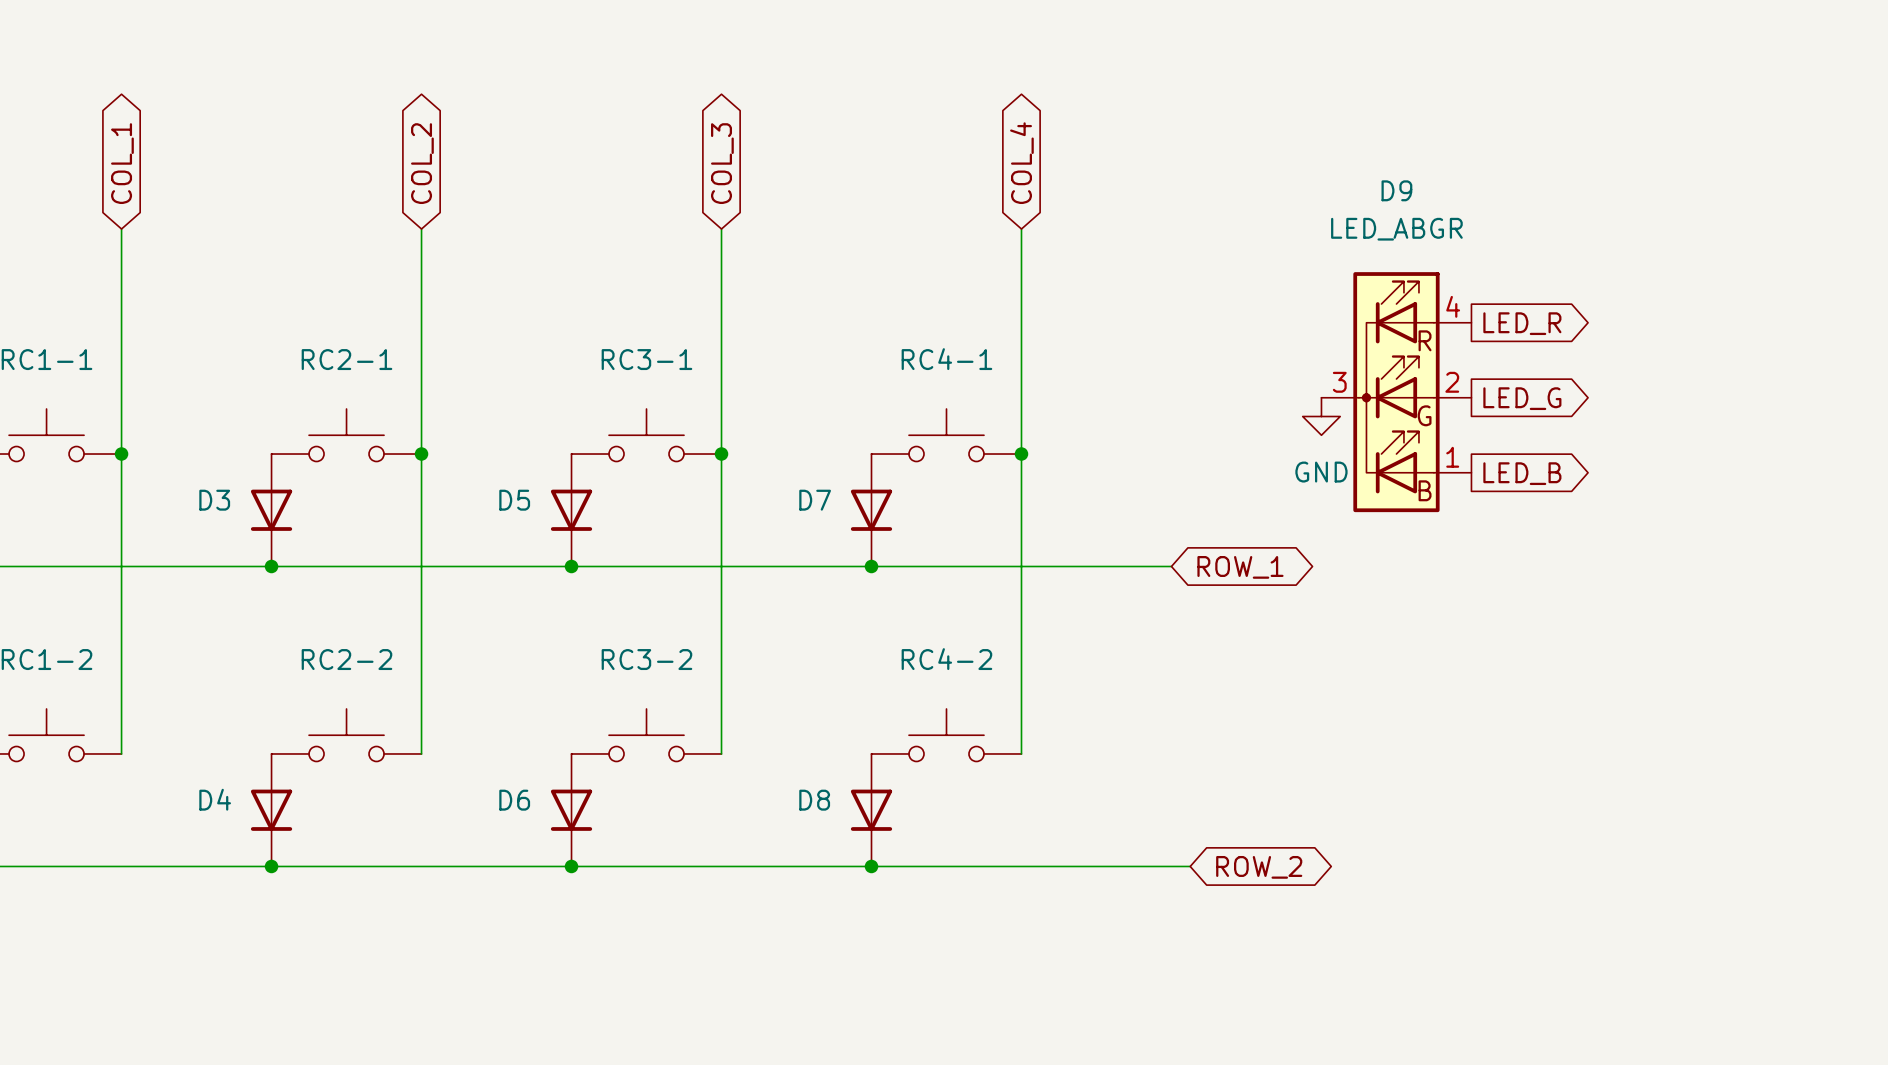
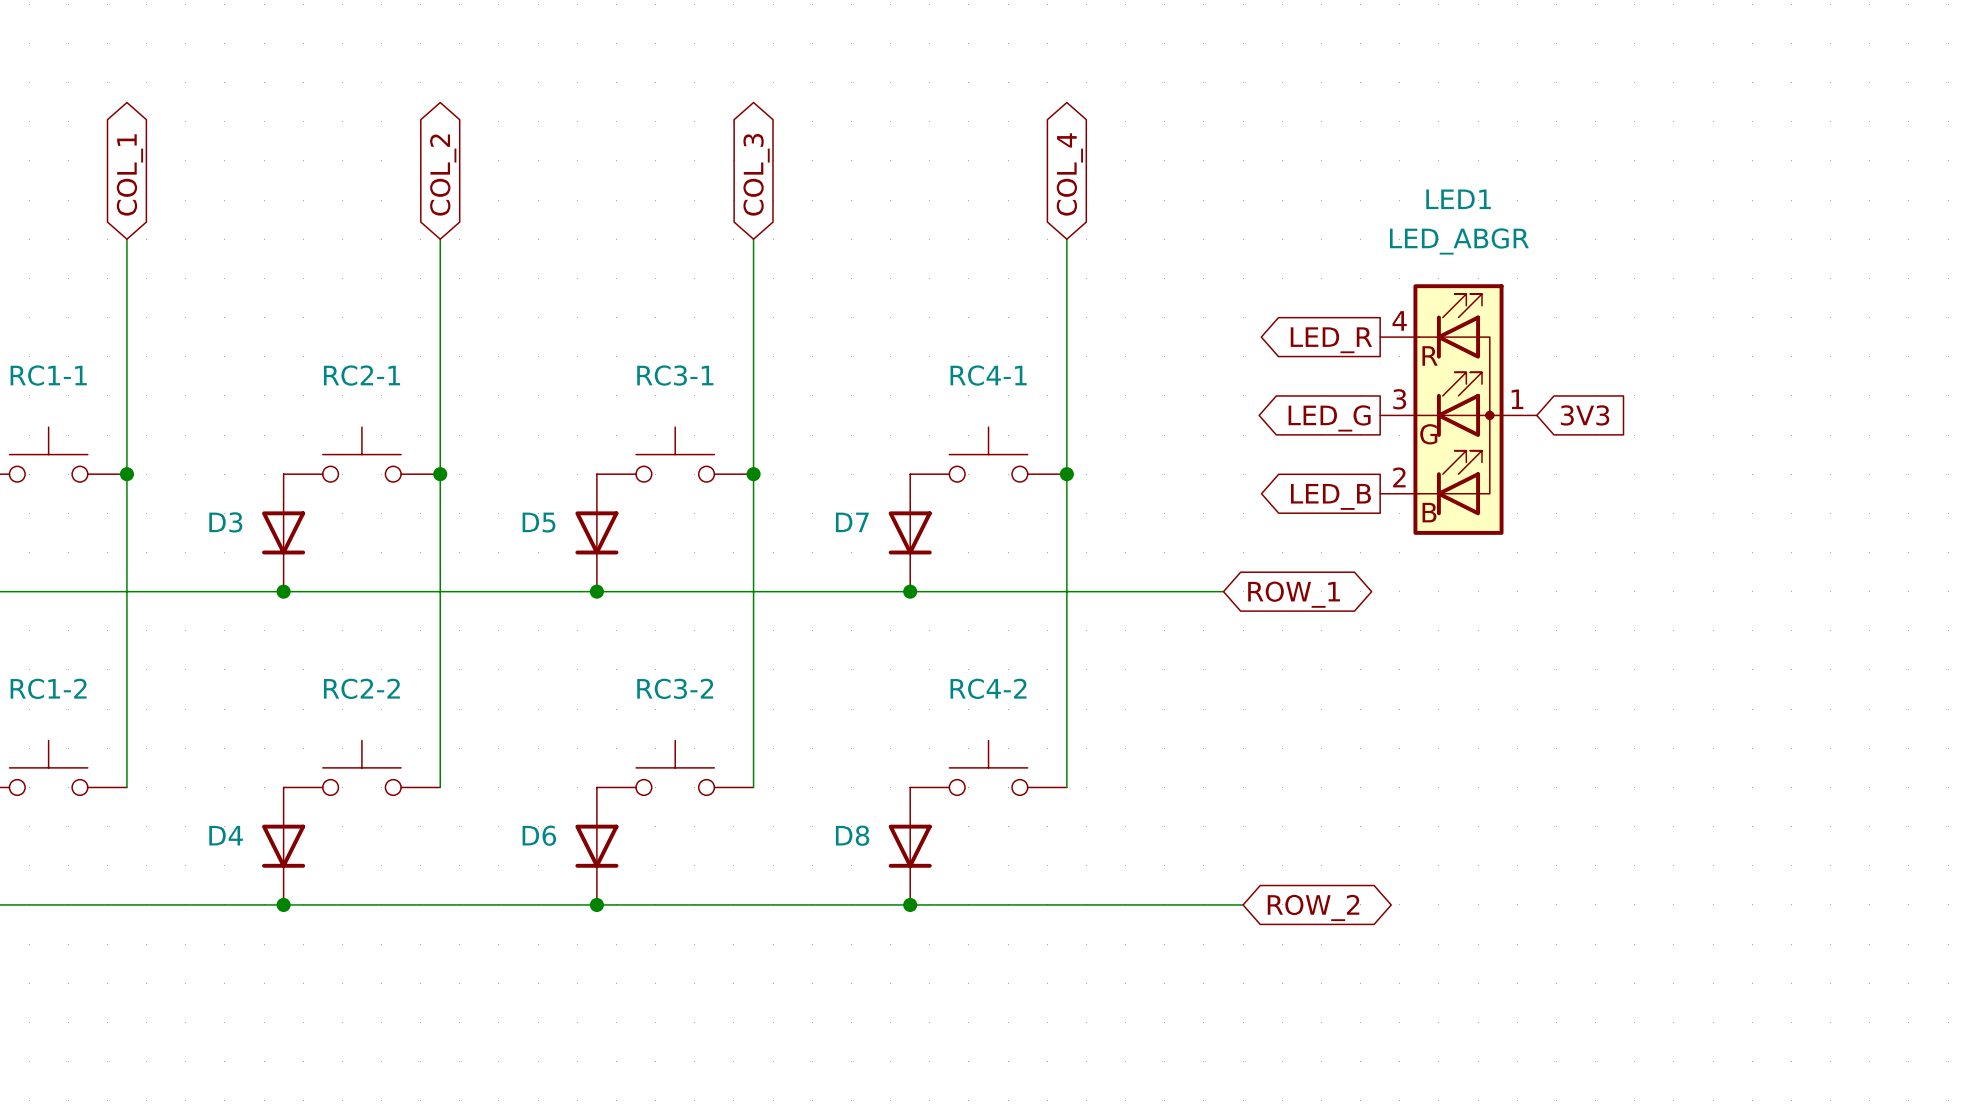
global label rotation: 0° (1522, 323) -> 180° (1331, 340)
global label position: LED_R (1522, 323) -> LED_R (1331, 340)
D9: LED_ABGR (1396, 392) -> none
LED1: none -> LED_ABGR (1458, 409)
global label: none -> LED_G (1329, 418)
global label shape: output (1522, 398) -> input (1585, 415)
global label: LED_G (1522, 398) -> 3V3 (1585, 415)
power symbol: GND (1321, 416) -> none
global label rotation: 0° (1522, 473) -> 180° (1330, 496)
global label position: LED_B (1522, 473) -> LED_B (1330, 496)

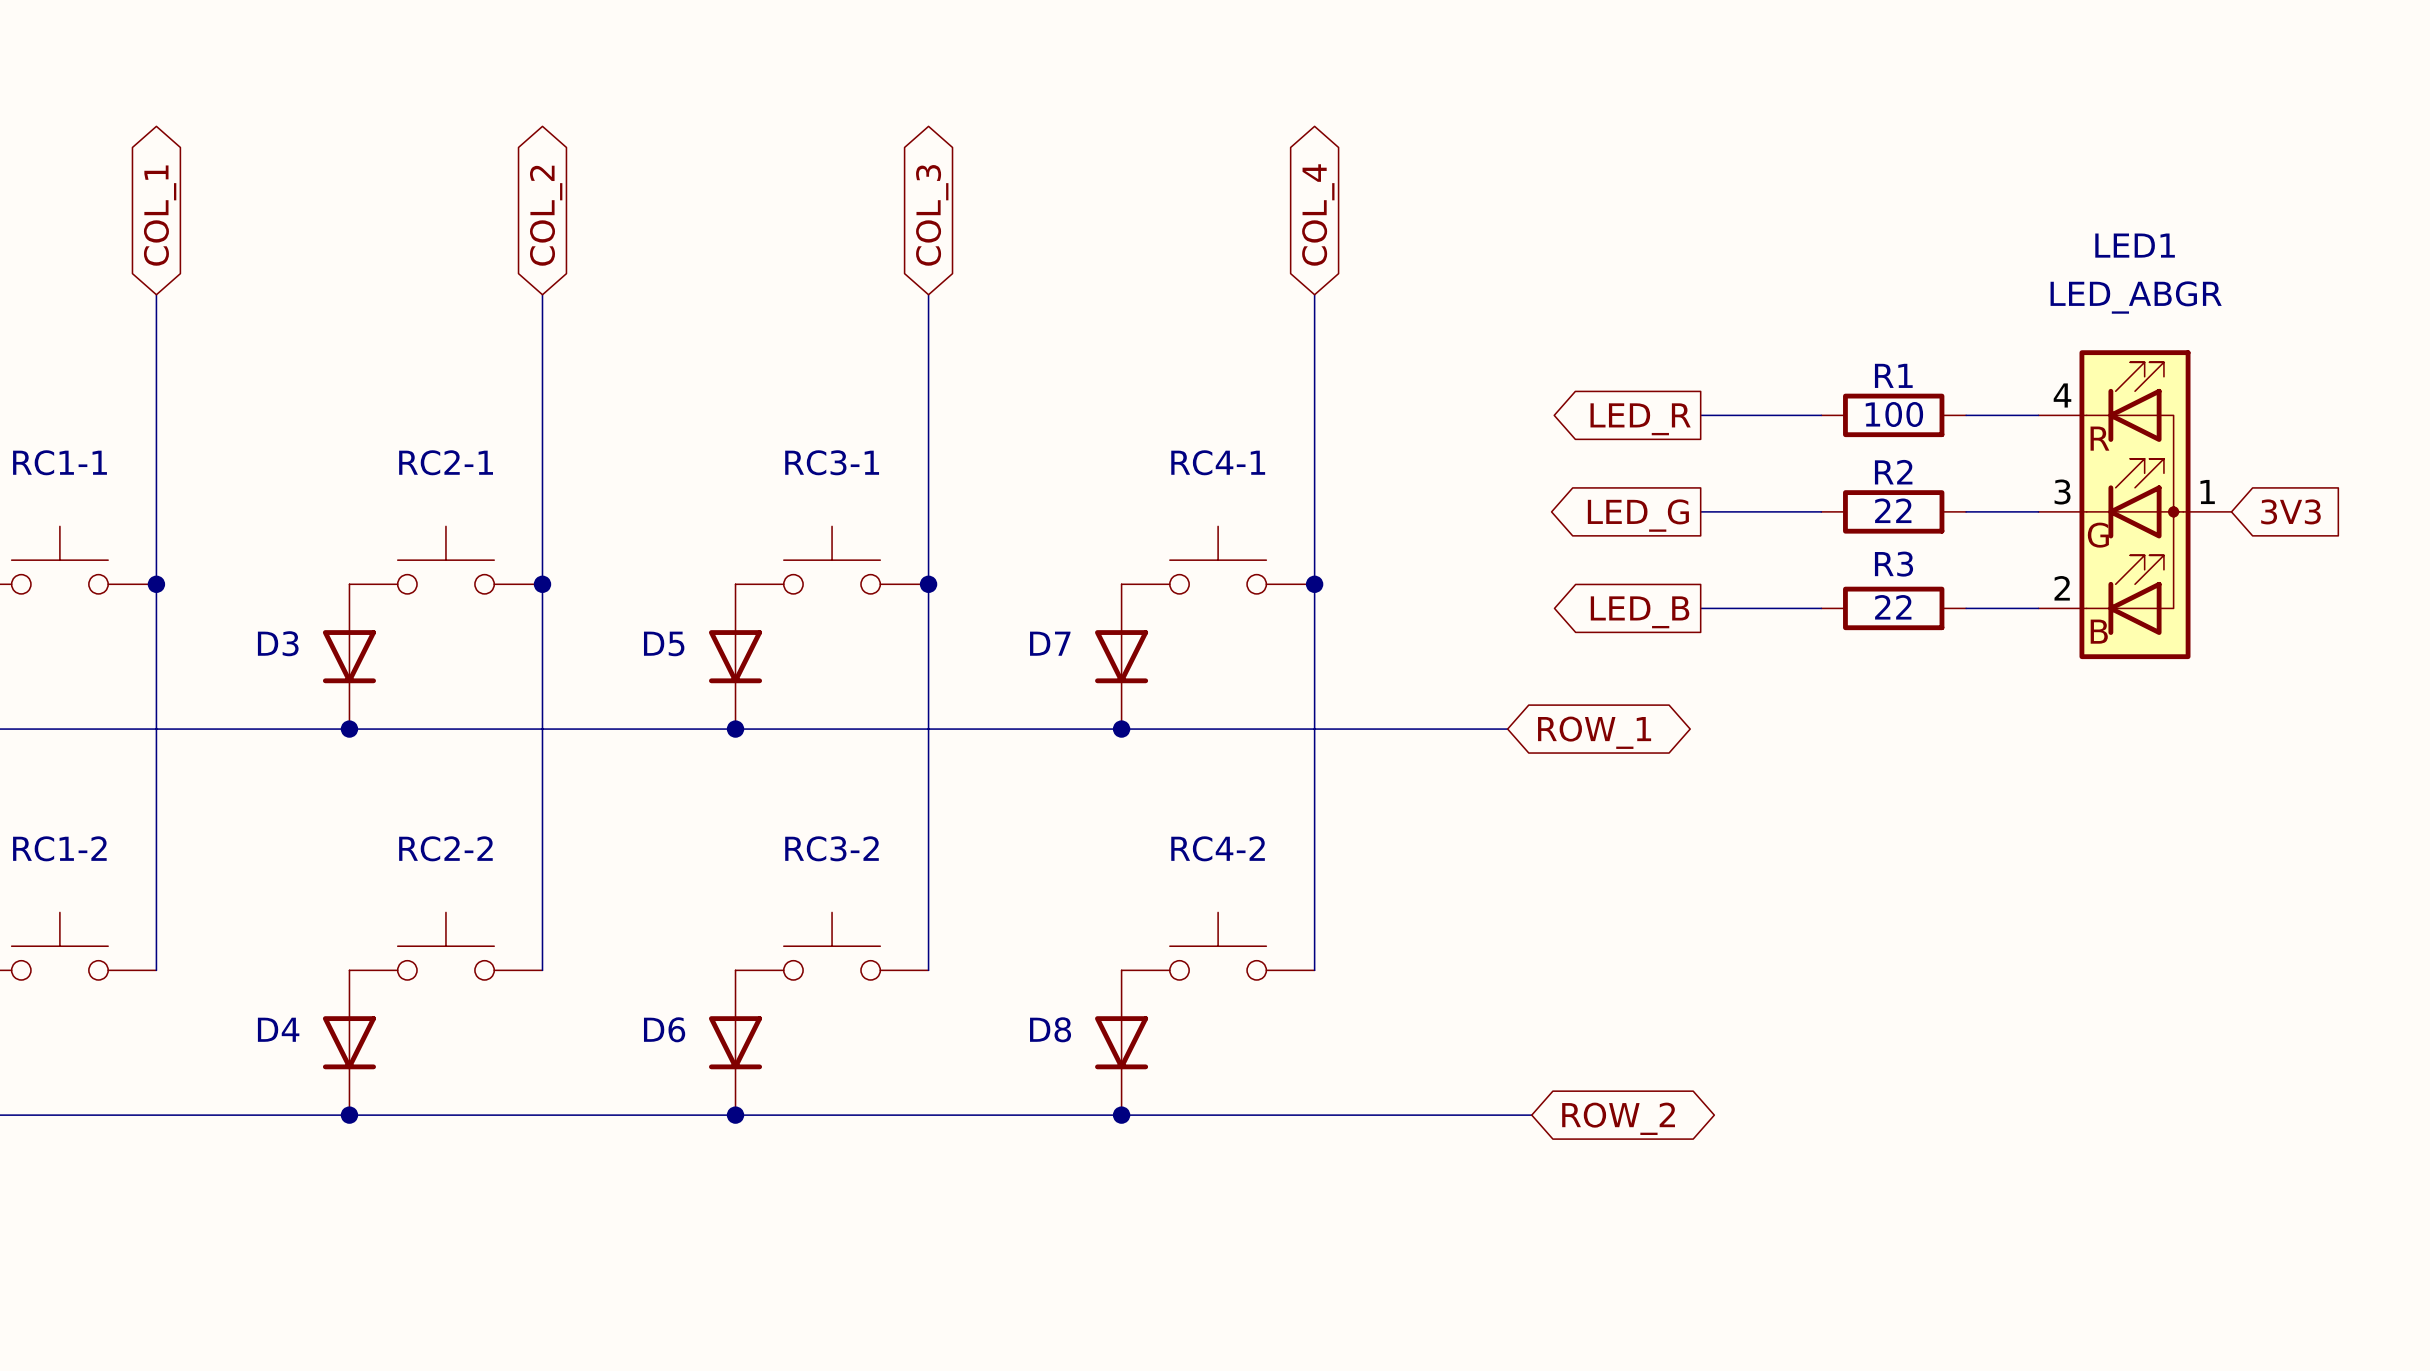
R1: none -> 100 (1893, 415)
wire: none -> (1966, 415) (2038, 415)
LED1 position: (1458, 409) -> (2135, 504)
R2: none -> 22 (1893, 511)
global label position: 3V3 (1585, 415) -> 3V3 (2290, 511)
wire: none -> (1966, 511) (2038, 511)
R3: none -> 22 (1893, 608)
wire: none -> (1966, 608) (2038, 608)

